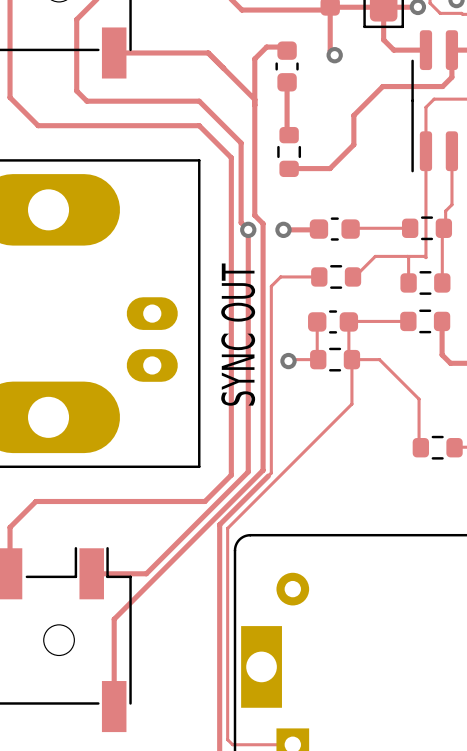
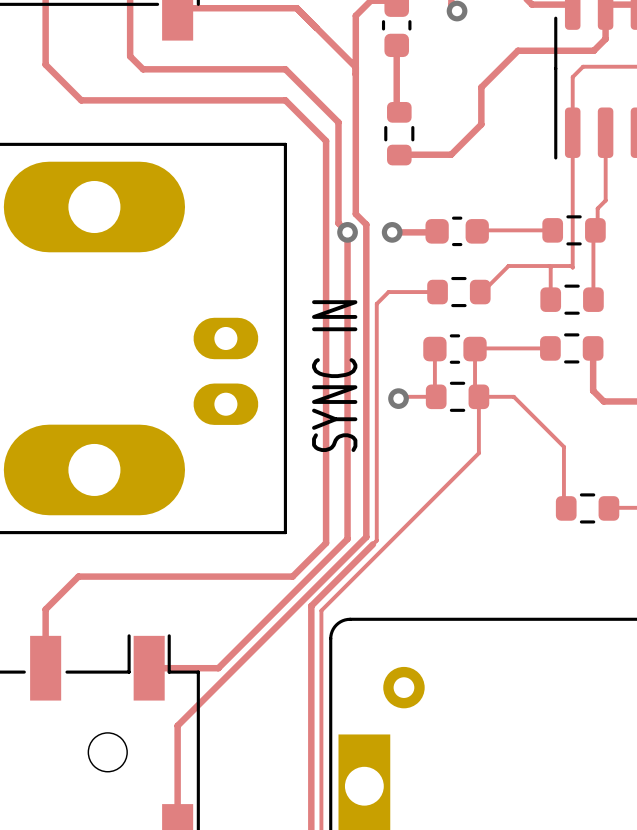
text: SYNC OUT (238, 334) -> SYNC IN (334, 376)

